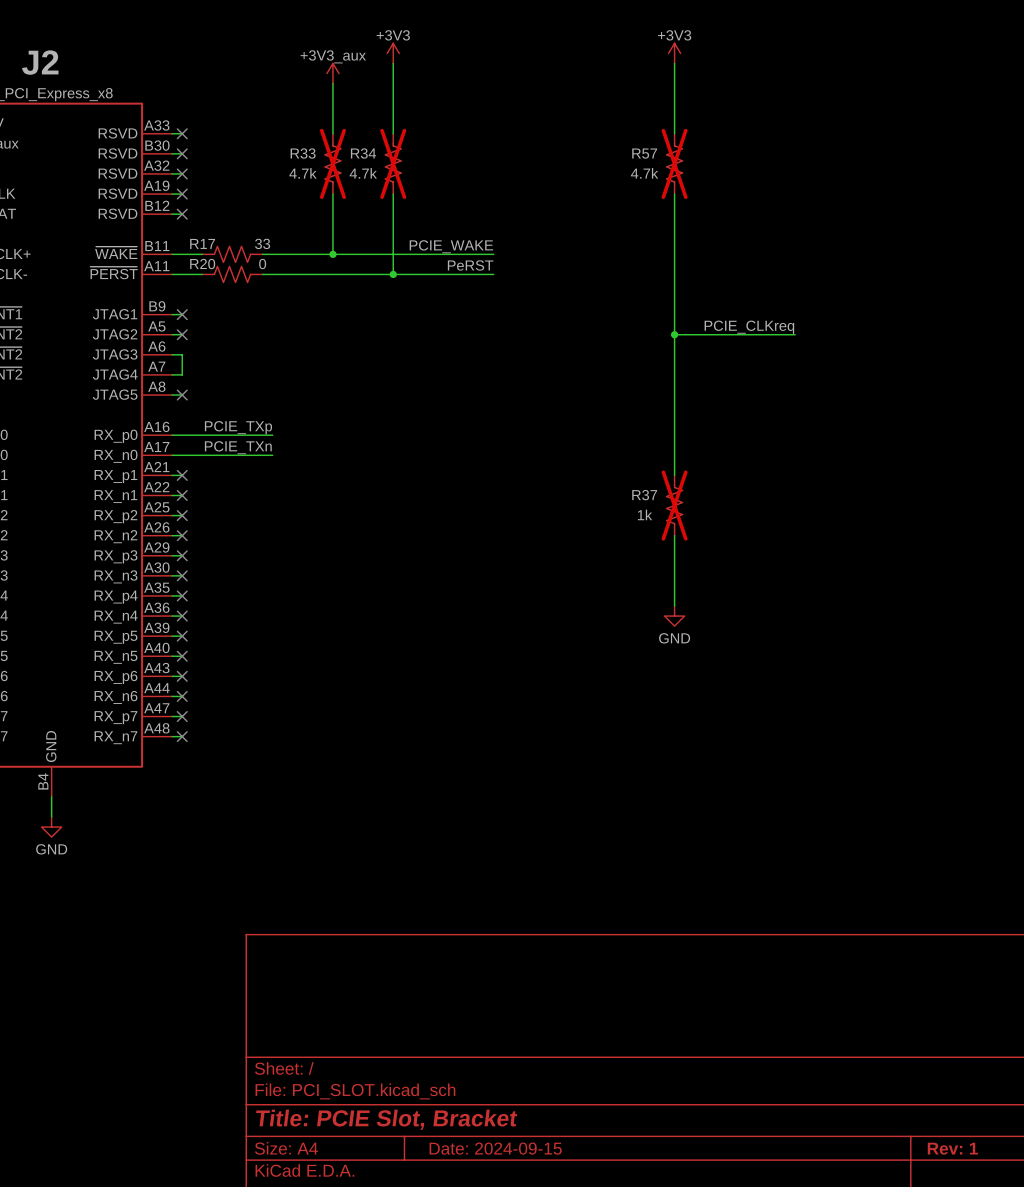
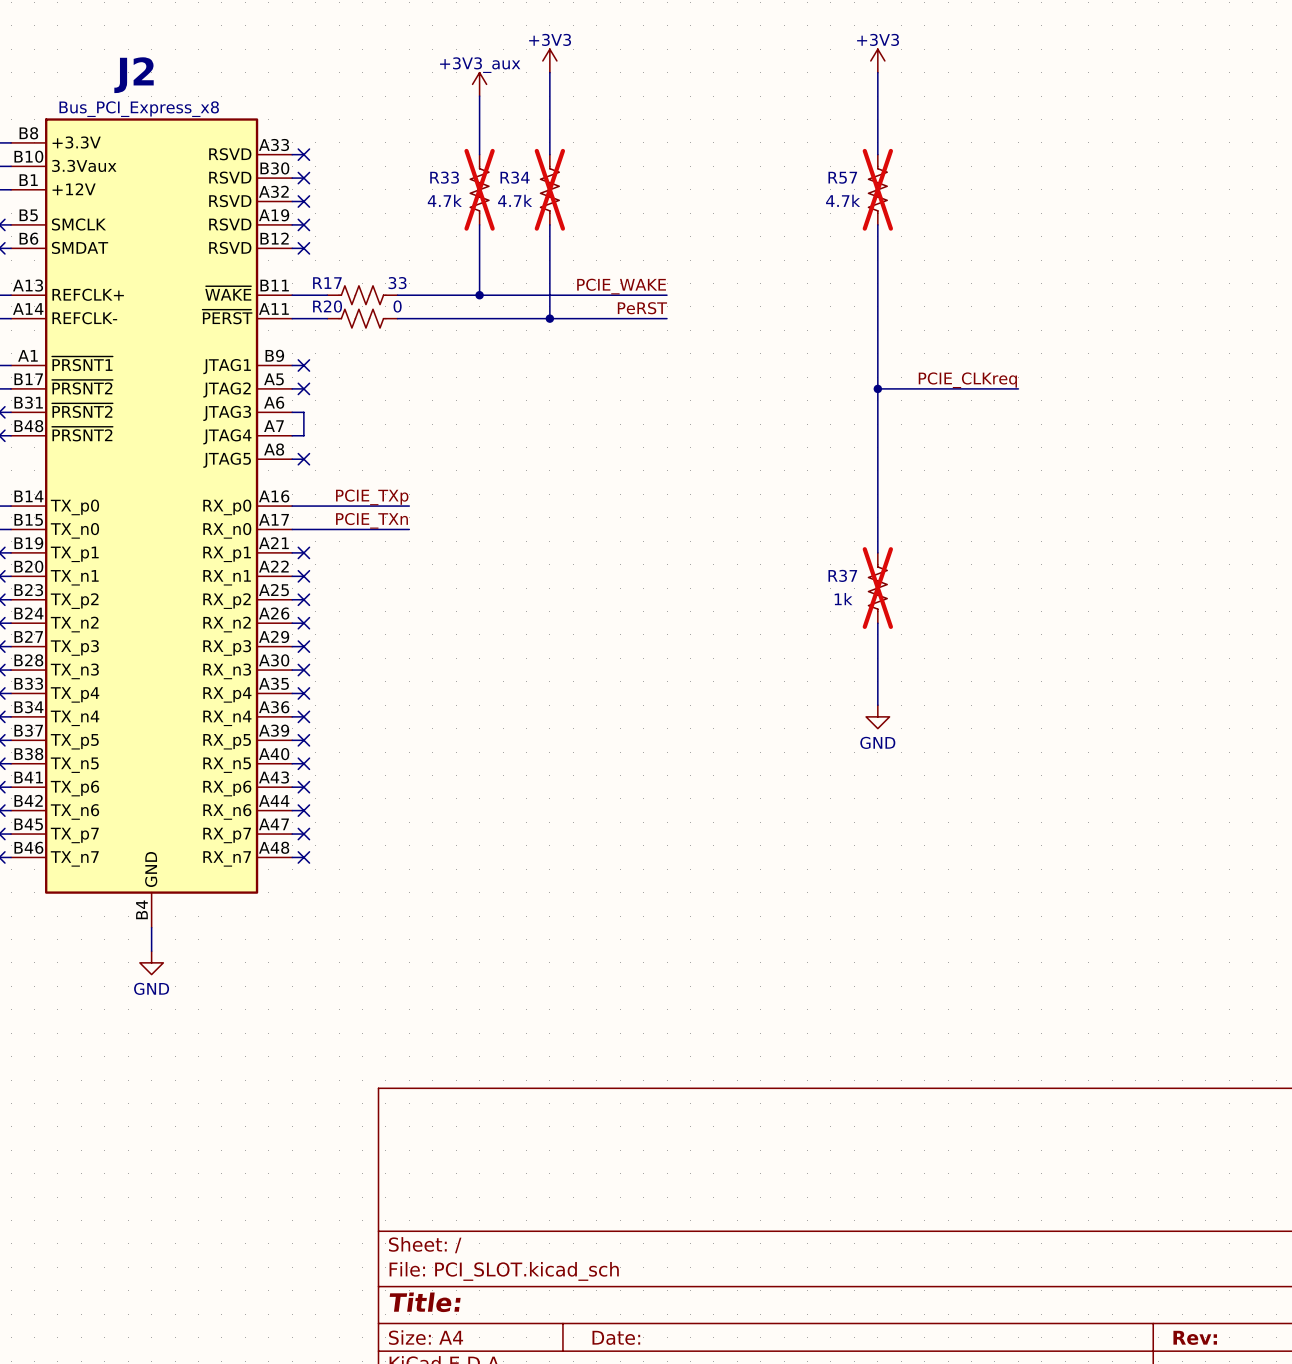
title block: Title: PCIE Slot, Bracket (386, 1119) -> Title: (425, 1302)
title block: Date: 2024-09-15 (495, 1148) -> Date: (616, 1337)
title block: Rev: 1 (952, 1148) -> Rev: (1195, 1337)

